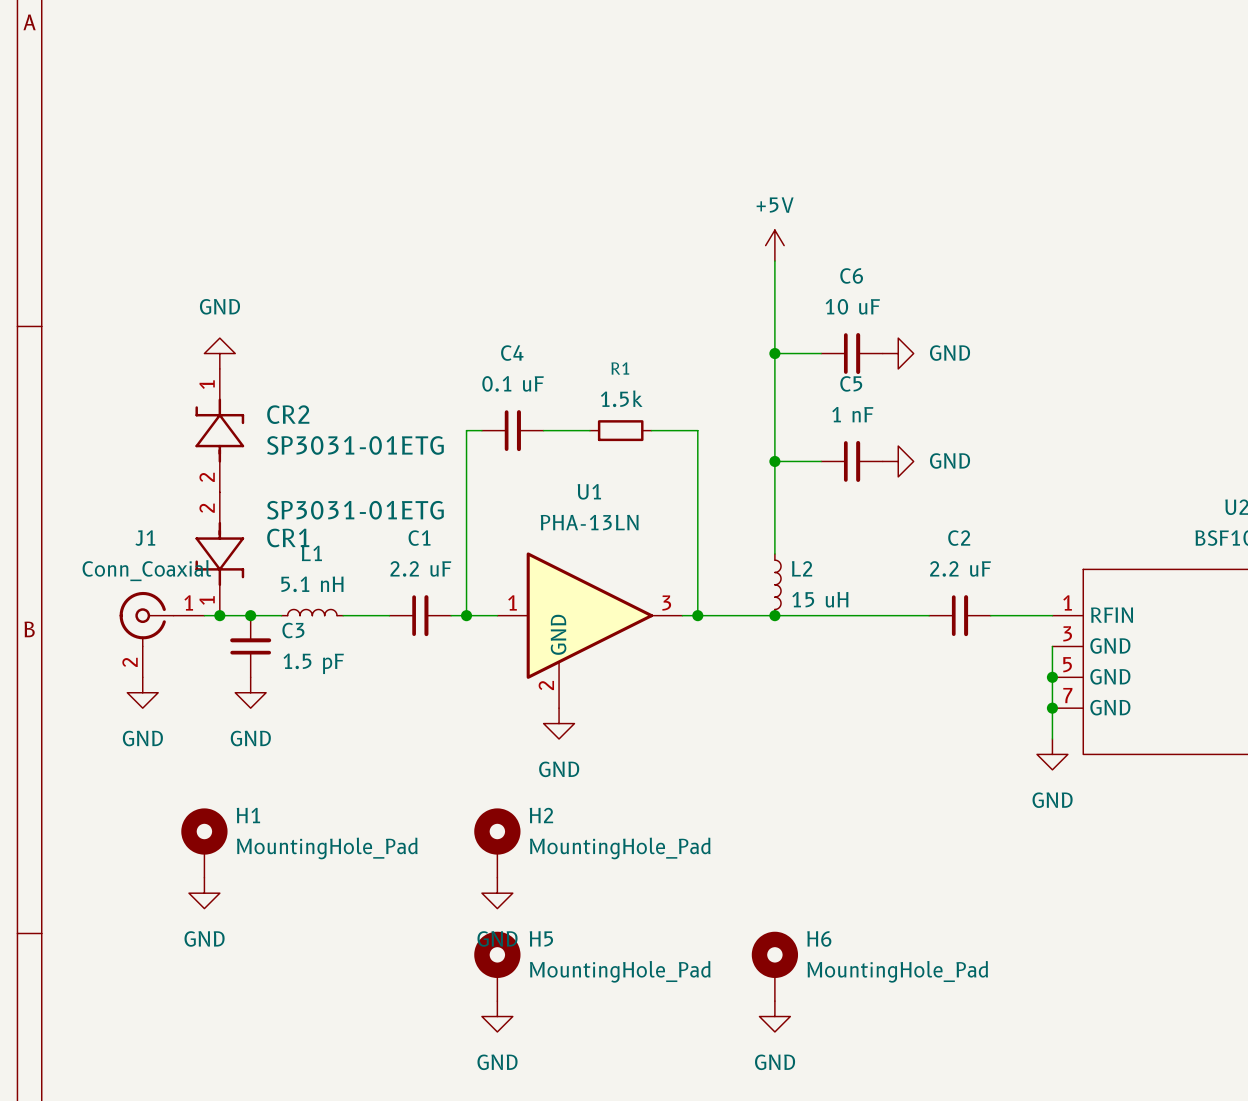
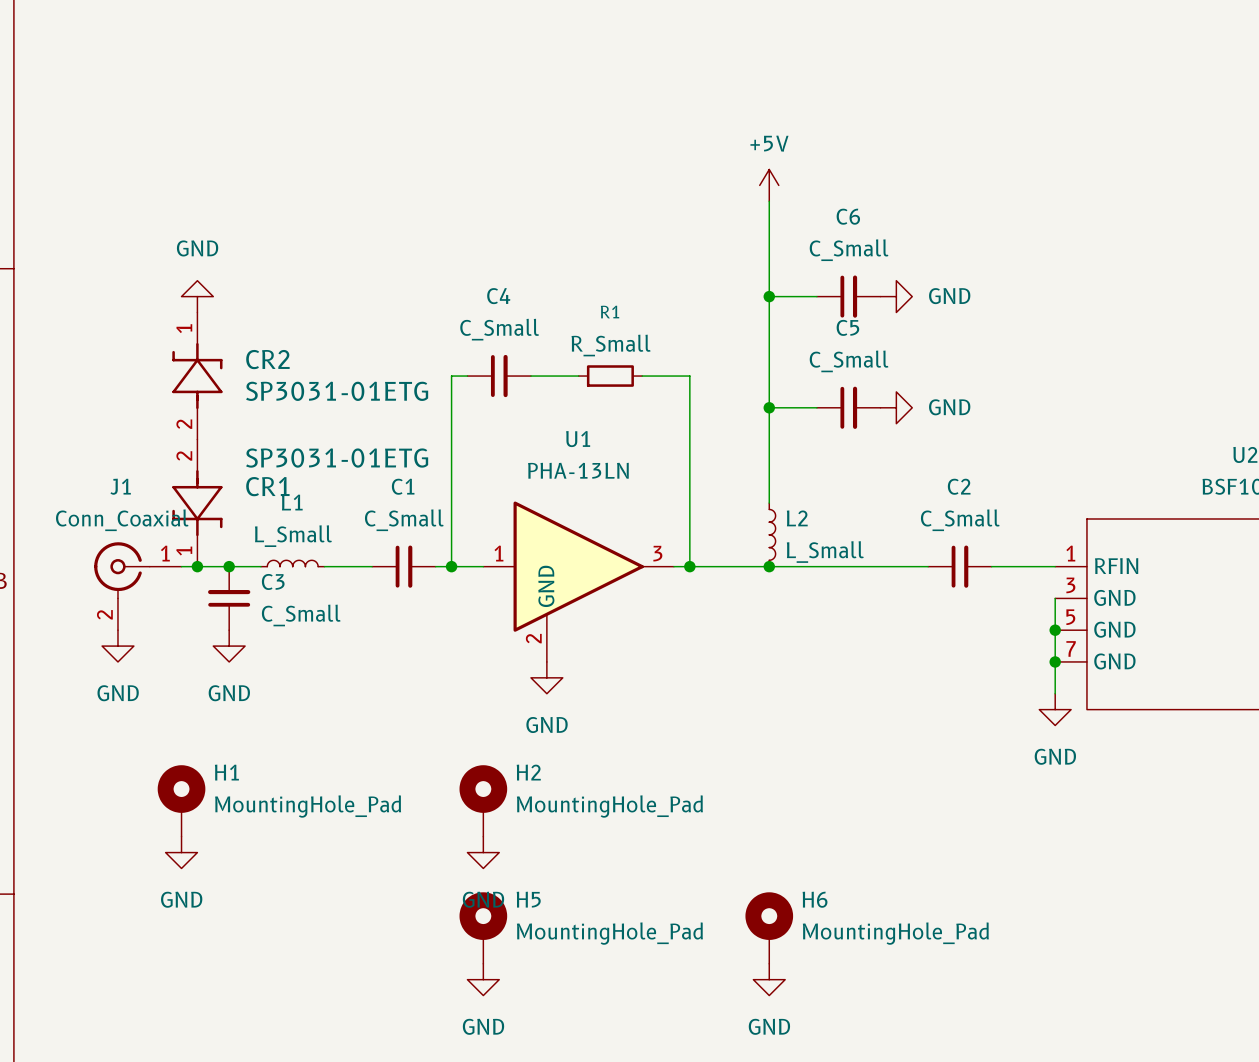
C6 value: 10 uF (852, 306) -> C_Small (849, 250)
C4 value: 0.1 uF (513, 383) -> C_Small (499, 329)
R1 value: 1.5k (621, 398) -> R_Small (611, 345)
C5 value: 1 nF (852, 414) -> C_Small (849, 361)
C1 value: 2.2 uF (420, 568) -> C_Small (404, 520)
C2 value: 2.2 uF (960, 568) -> C_Small (960, 520)
L1 value: 5.1 nH (312, 584) -> L_Small (293, 536)
L2 value: 15 uH (820, 599) -> L_Small (825, 552)
C3 value: 1.5 pF (313, 663) -> C_Small (301, 615)

